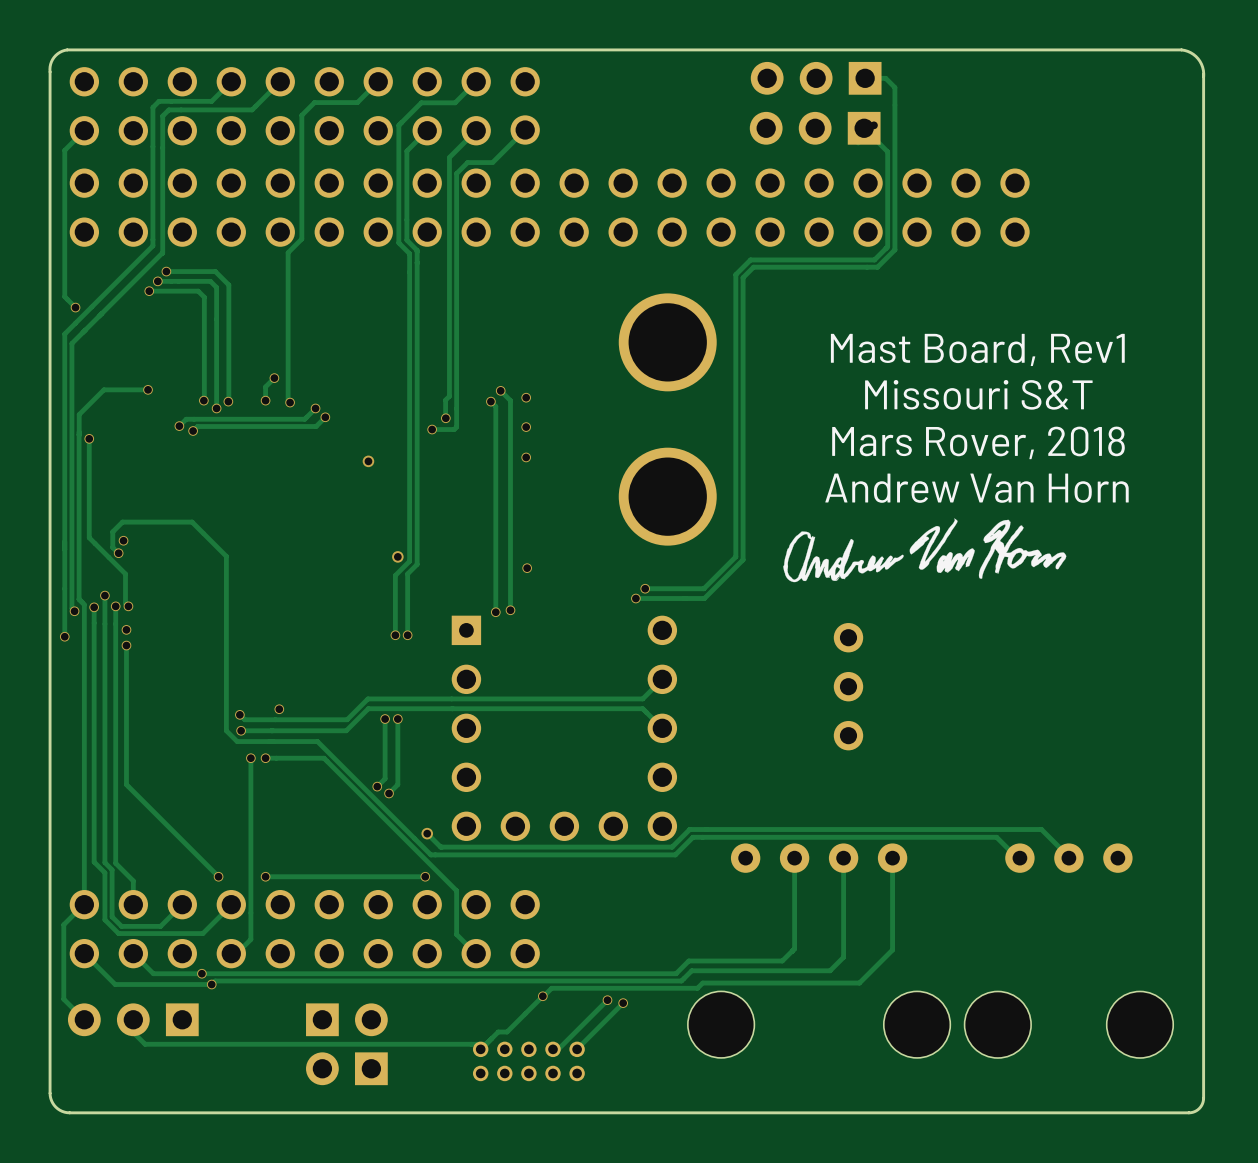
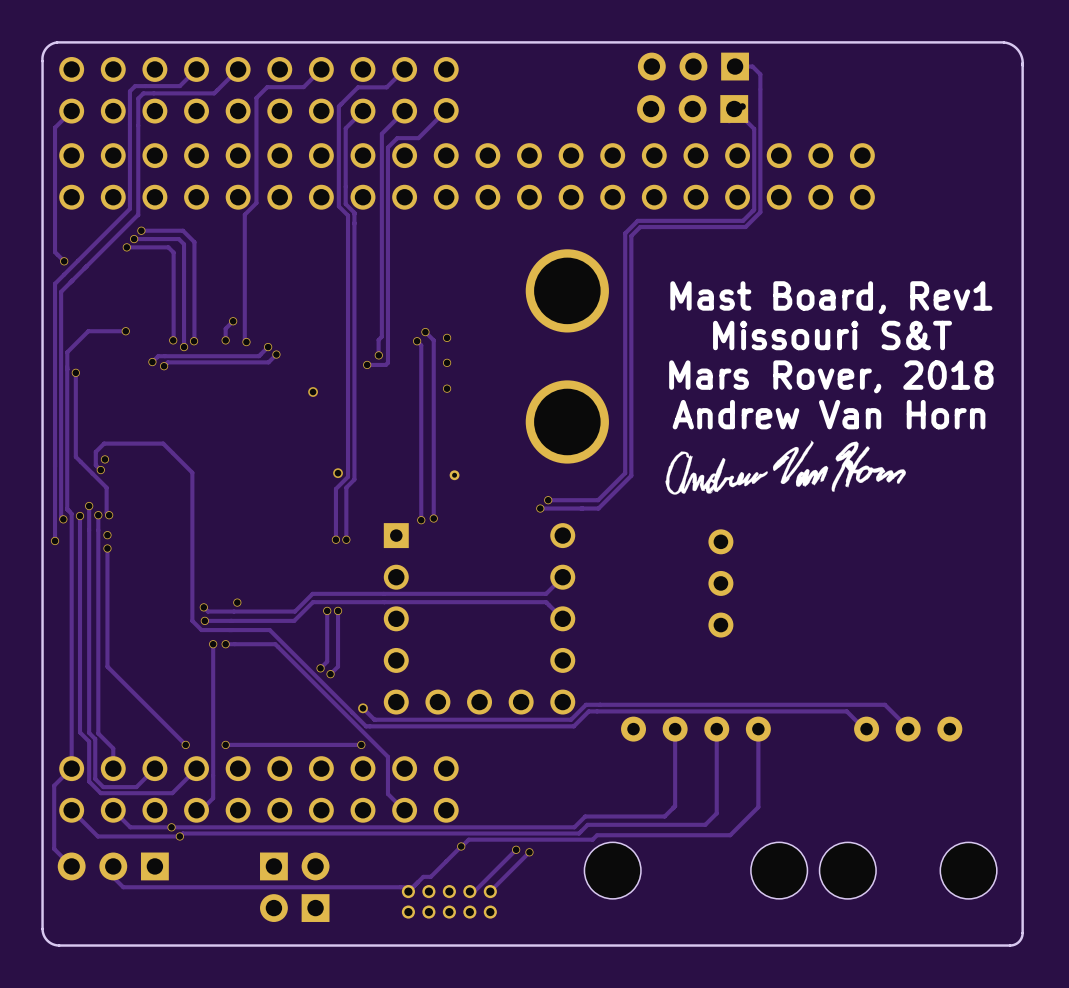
part: none -> (454, 475)
via: (527, 568) -> none

